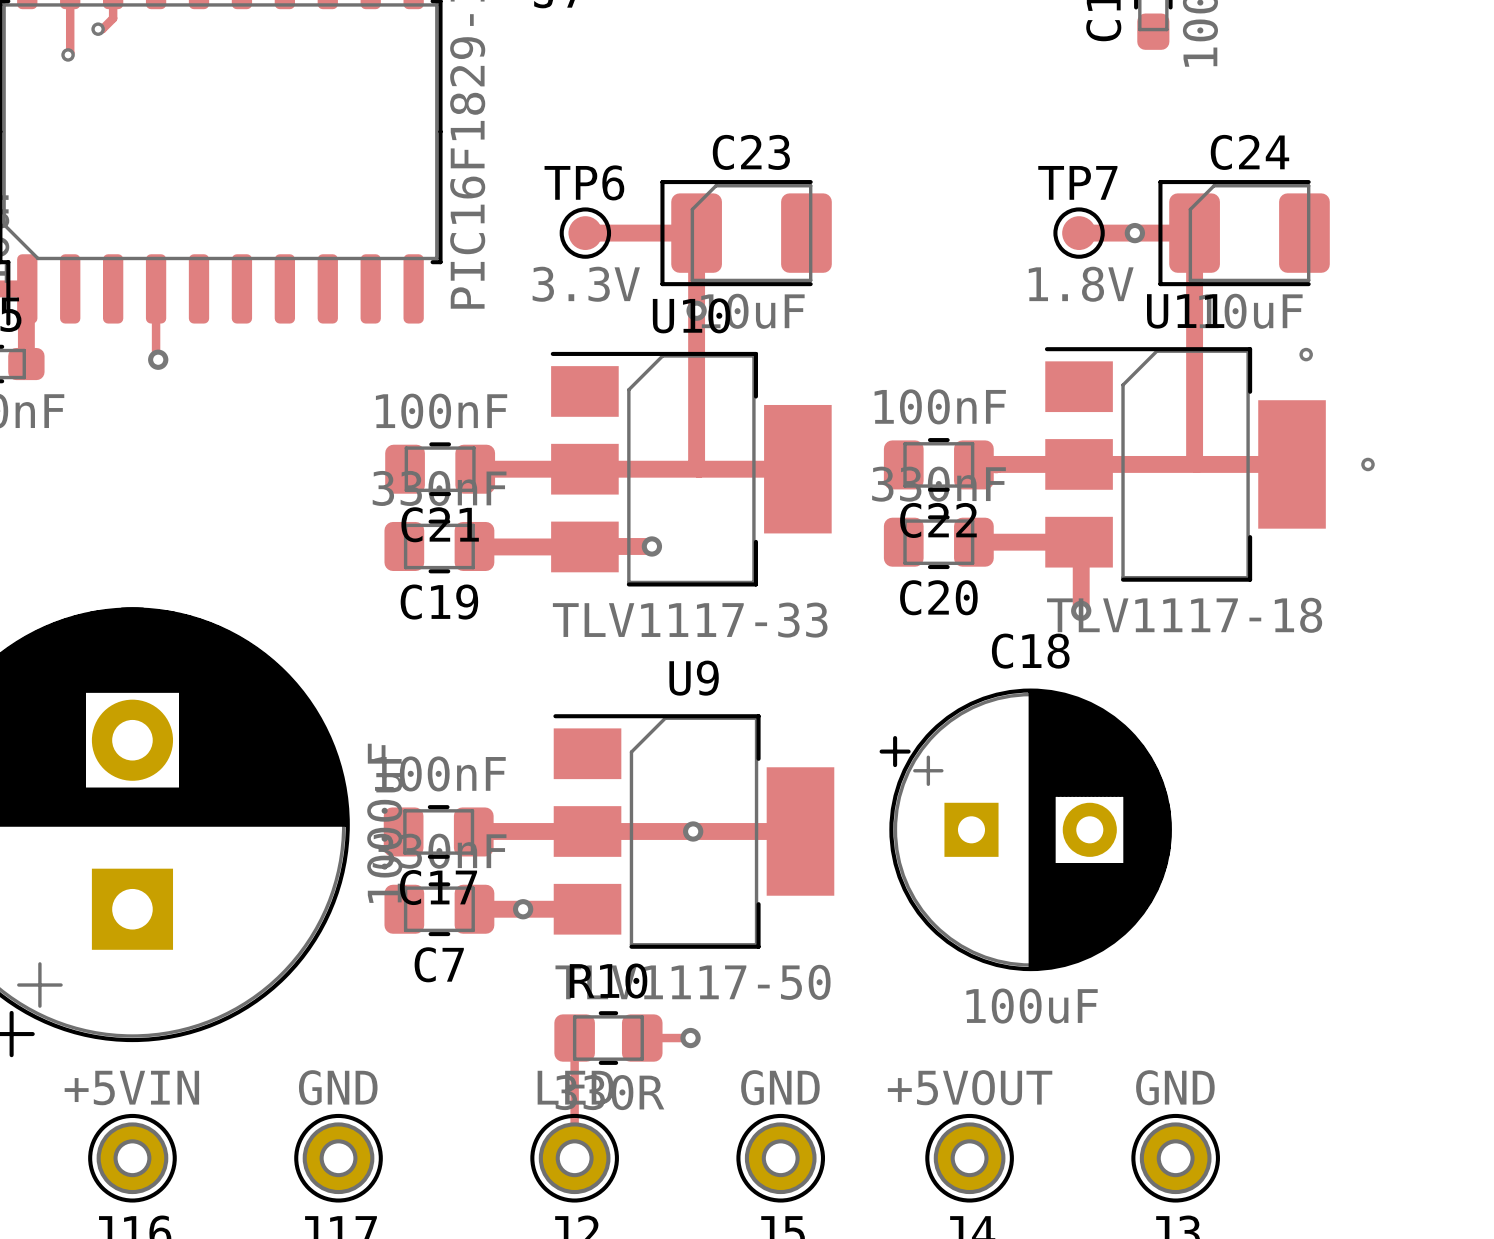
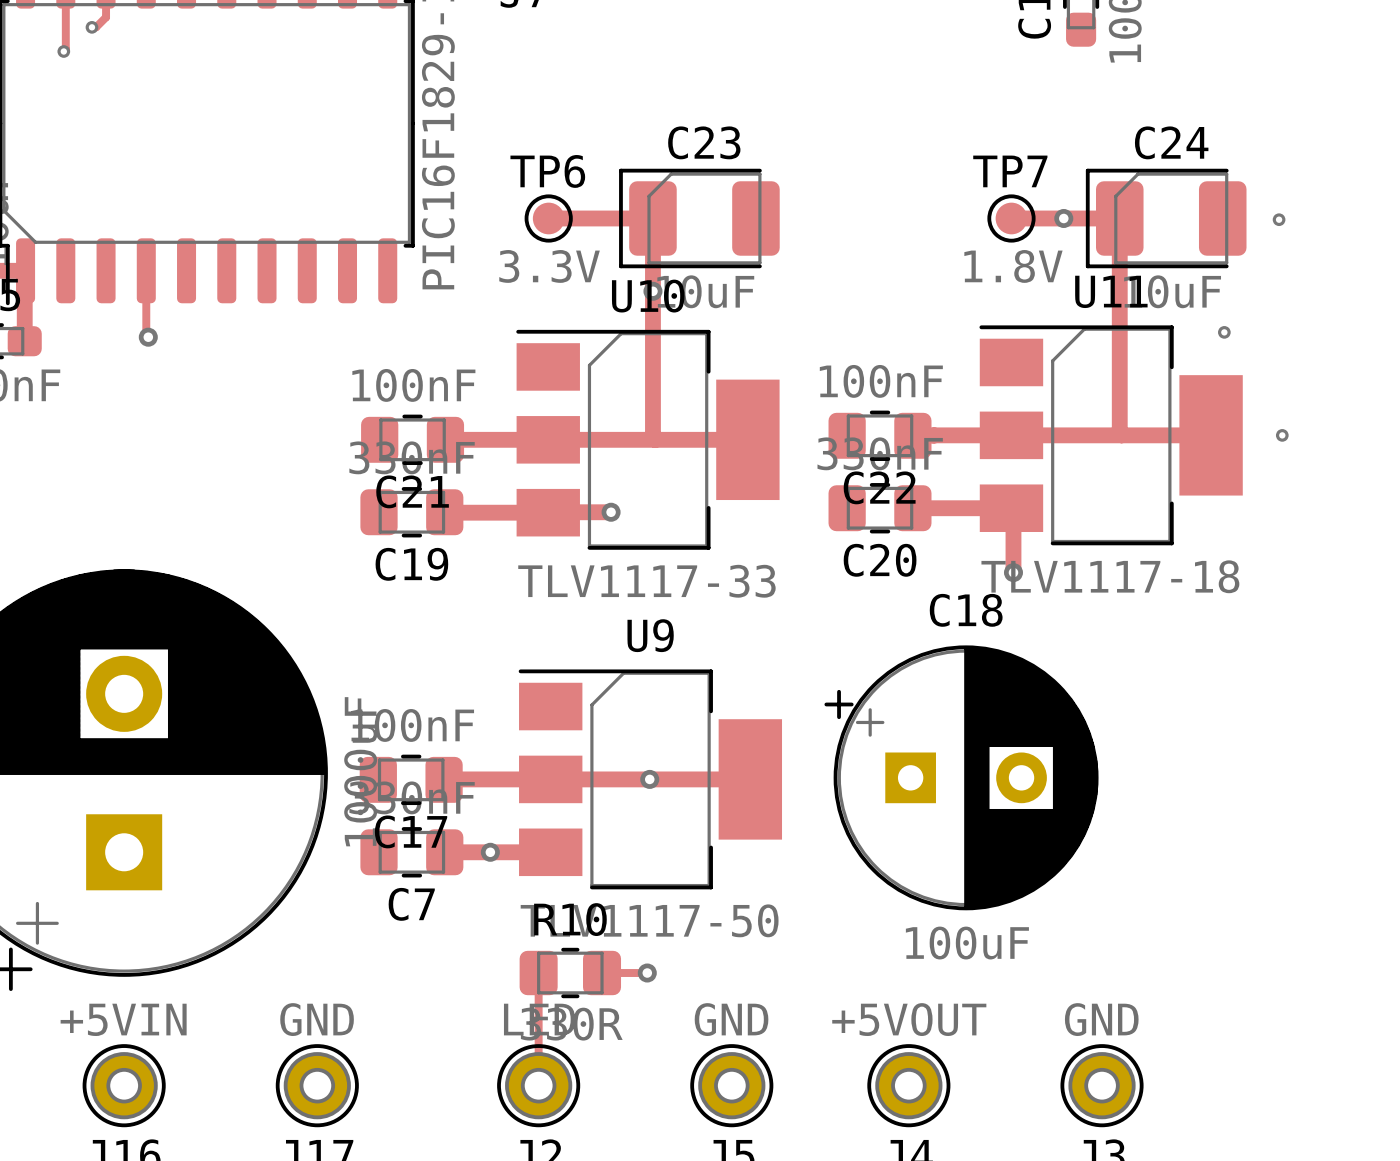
via: none -> (1279, 219)

